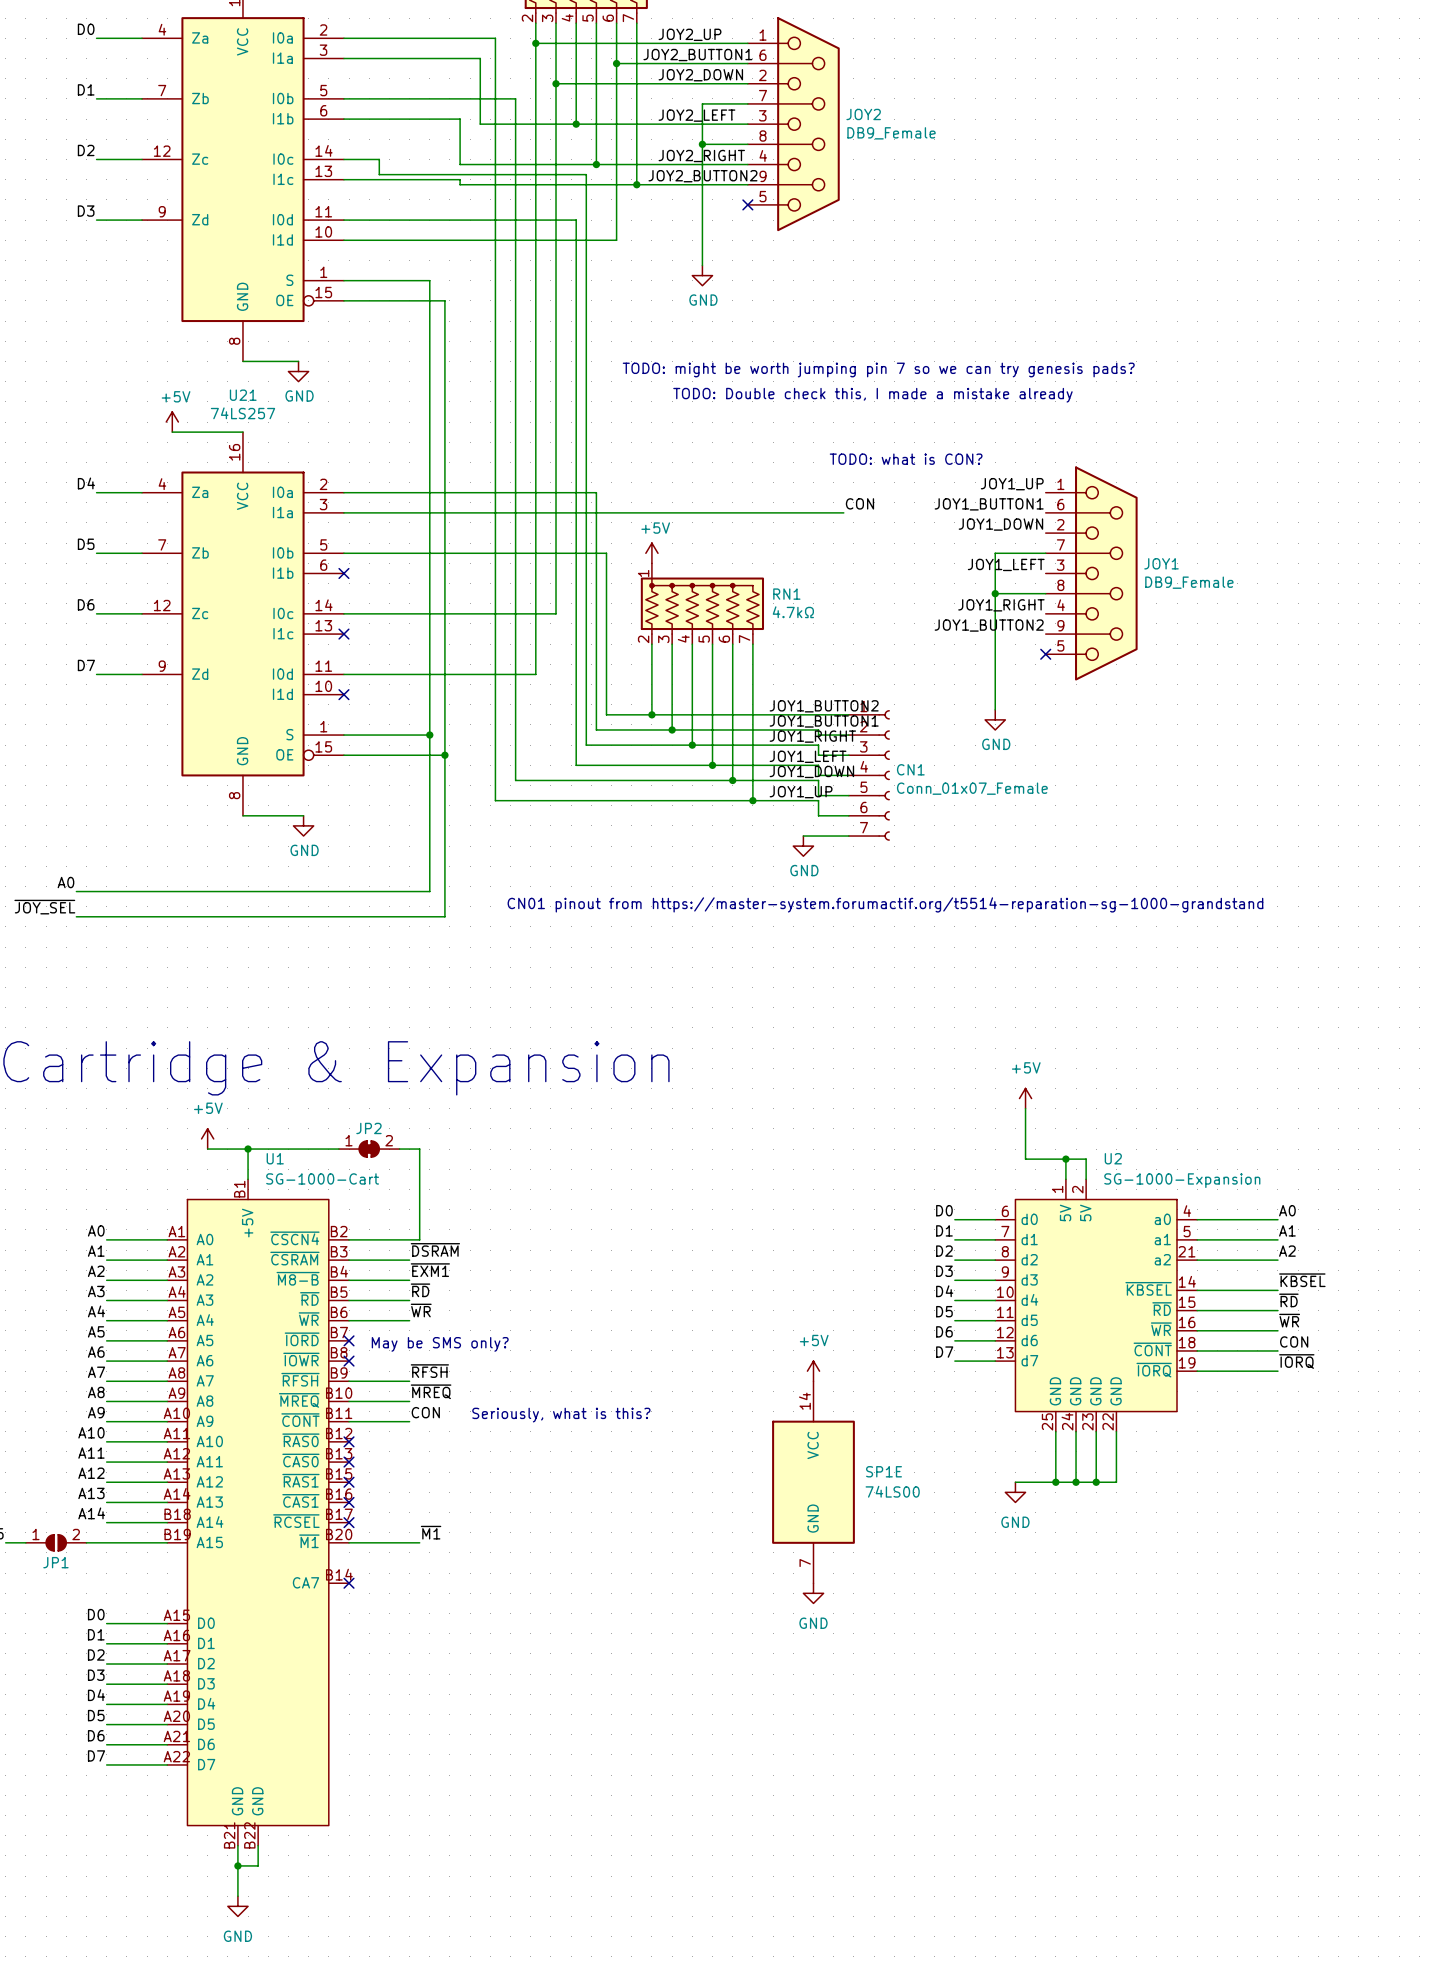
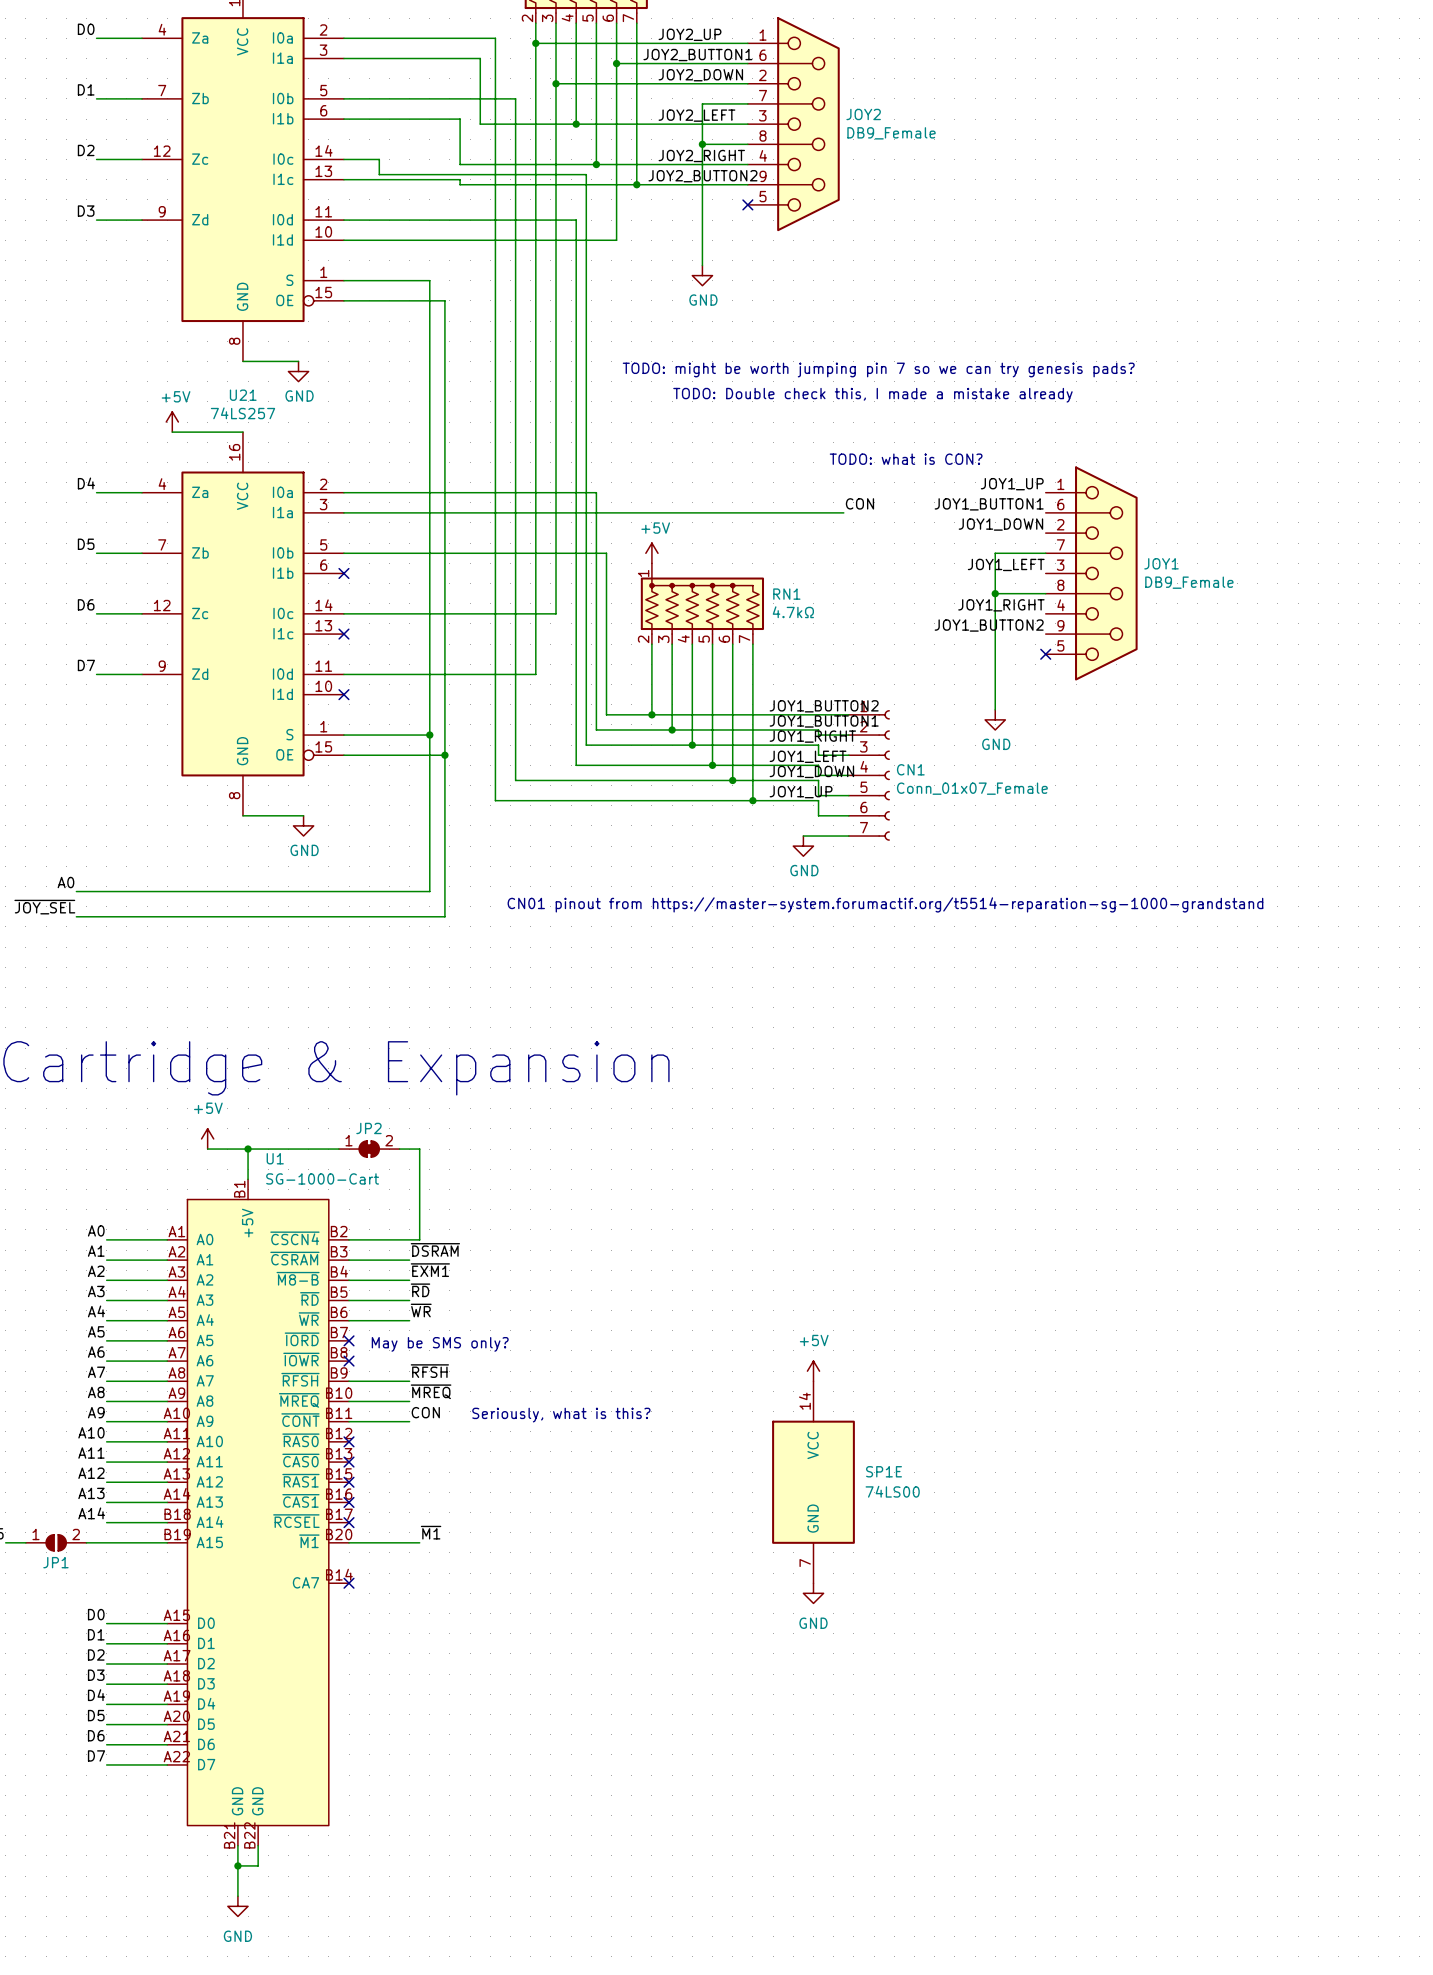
power symbol: +5V (1025, 1098) -> none
wire: (1025, 1108) (1025, 1159) (1086, 1159) (1086, 1179) -> none
wire: (1065, 1159) (1065, 1179) -> none
junction: (1065, 1159) -> none
label: D0 (944, 1210) -> none
label: A0 (1287, 1210) -> none
wire: (954, 1219) (995, 1219) -> none
wire: (1197, 1219) (1277, 1219) -> none
label: D1 (944, 1230) -> none
label: A1 (1287, 1230) -> none
wire: (954, 1239) (995, 1239) -> none
wire: (1197, 1239) (1277, 1239) -> none
label: D2 (944, 1251) -> none
label: A2 (1287, 1251) -> none
wire: (954, 1260) (995, 1260) -> none
wire: (1197, 1260) (1277, 1260) -> none
label: D3 (944, 1271) -> none
wire: (954, 1280) (995, 1280) -> none
label: ~{KBSEL} (1302, 1280) -> none
wire: (1197, 1290) (1277, 1290) -> none
label: D4 (944, 1291) -> none
wire: (954, 1300) (995, 1300) -> none
label: ~{RD} (1288, 1300) -> none
U2: SG-1000-Expansion (1096, 1305) -> none
wire: (1197, 1310) (1277, 1310) -> none
label: D5 (944, 1311) -> none
wire: (954, 1320) (995, 1320) -> none
label: ~{WR} (1289, 1320) -> none
wire: (1197, 1330) (1277, 1330) -> none
label: D6 (944, 1331) -> none
wire: (954, 1340) (995, 1340) -> none
label: CON (1294, 1341) -> none
wire: (1197, 1350) (1277, 1350) -> none
label: D7 (944, 1352) -> none
wire: (954, 1361) (995, 1361) -> none
label: ~{IORQ} (1296, 1361) -> none
wire: (1197, 1371) (1277, 1371) -> none
wire: (1055, 1431) (1055, 1482) -> none
wire: (1076, 1431) (1076, 1482) -> none
wire: (1096, 1431) (1096, 1482) -> none
wire: (1116, 1431) (1116, 1482) (1015, 1482) -> none
junction: (1055, 1482) -> none
junction: (1076, 1482) -> none
junction: (1096, 1482) -> none
power symbol: GND (1015, 1492) -> none

